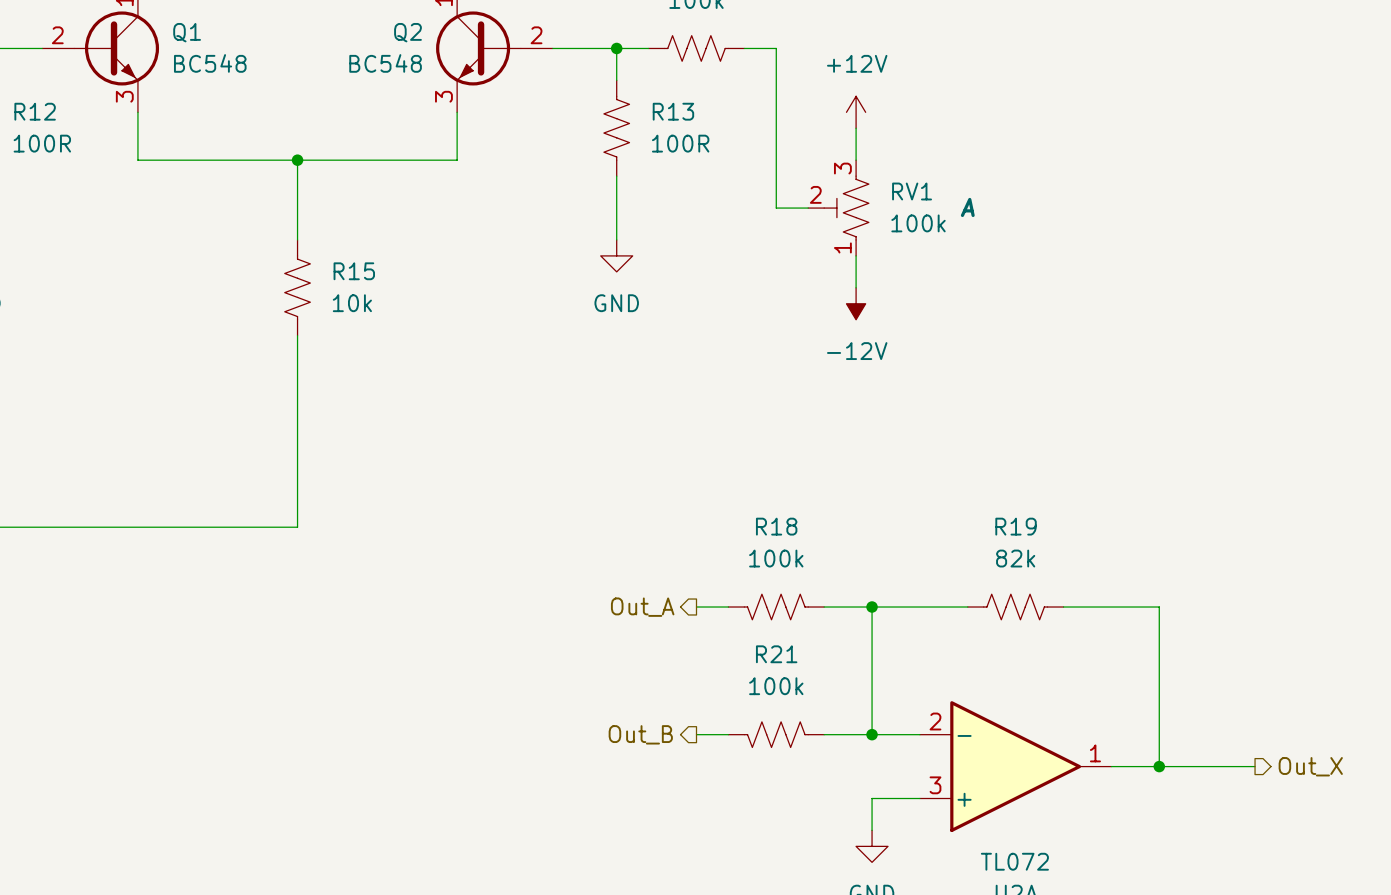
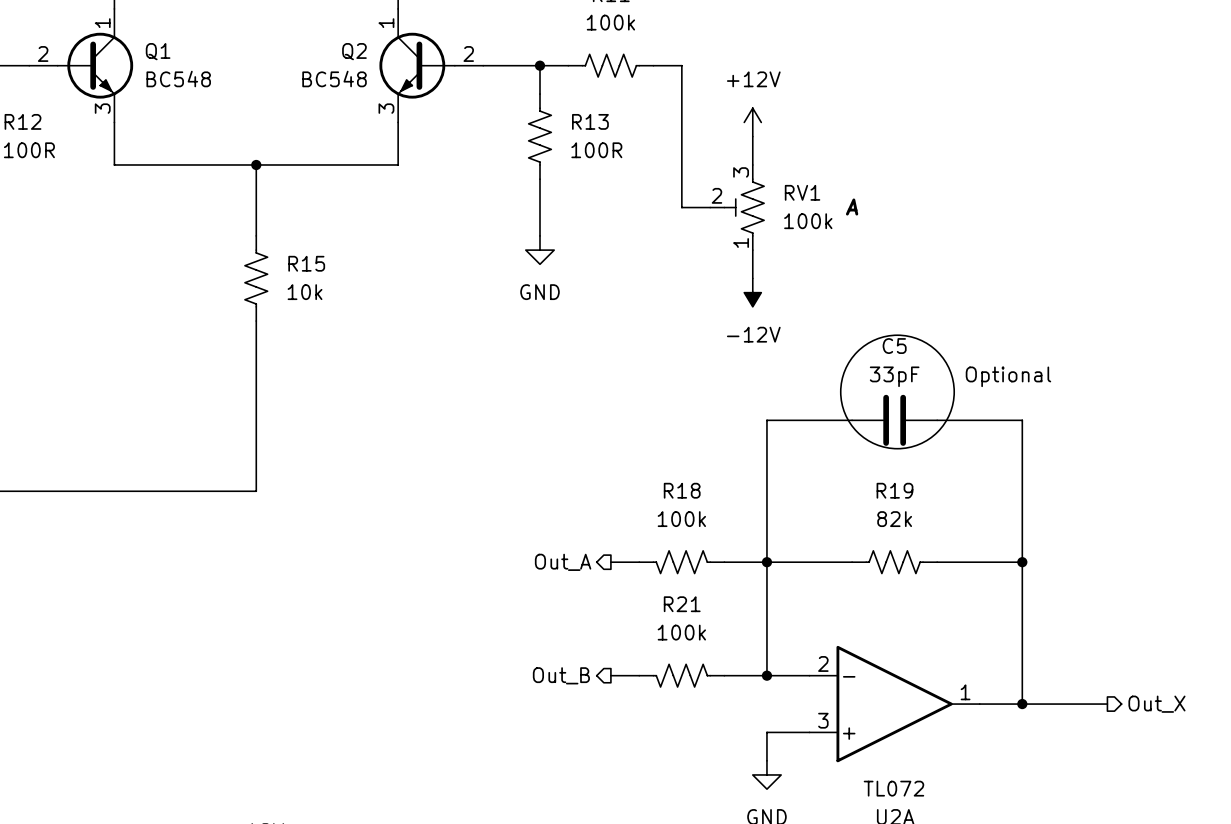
drawing: none -> [840, 335, 955, 449]
text: none -> Optional (1008, 376)
wire: none -> (852, 420) (766, 420) (766, 562)
C5: none -> 33pF (894, 420)
wire: none -> (937, 420) (1022, 420) (1022, 562)
junction: none -> (1022, 562)

